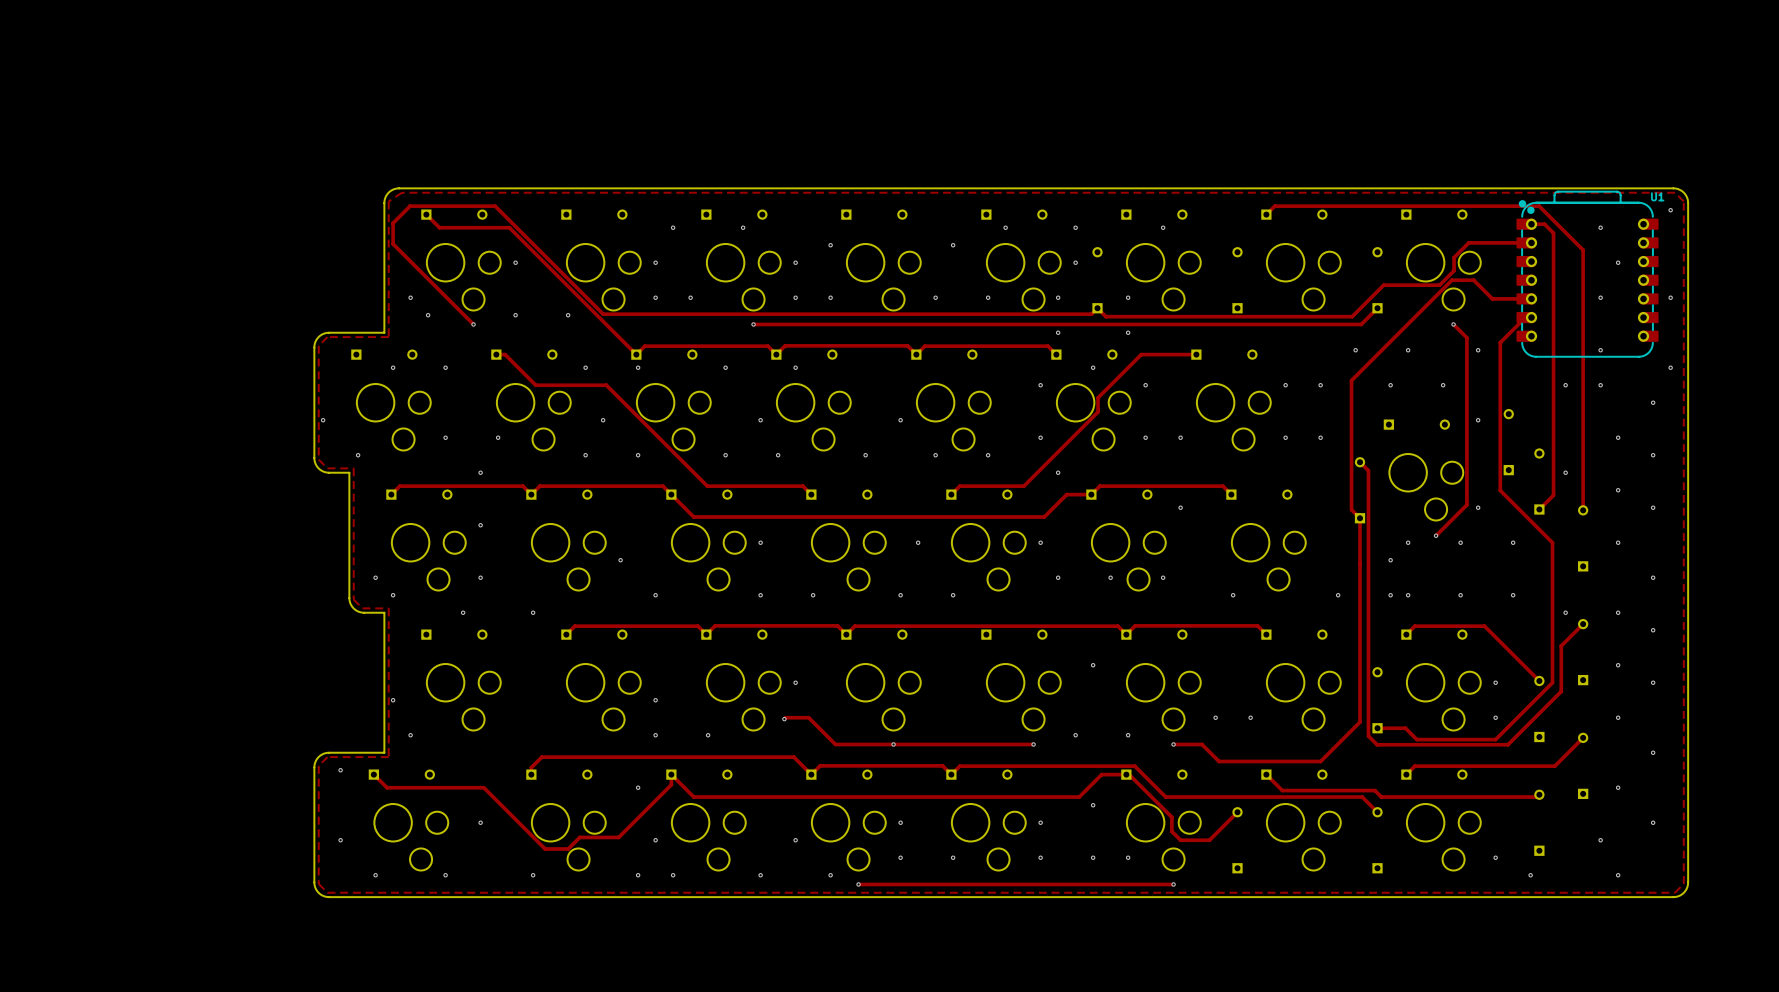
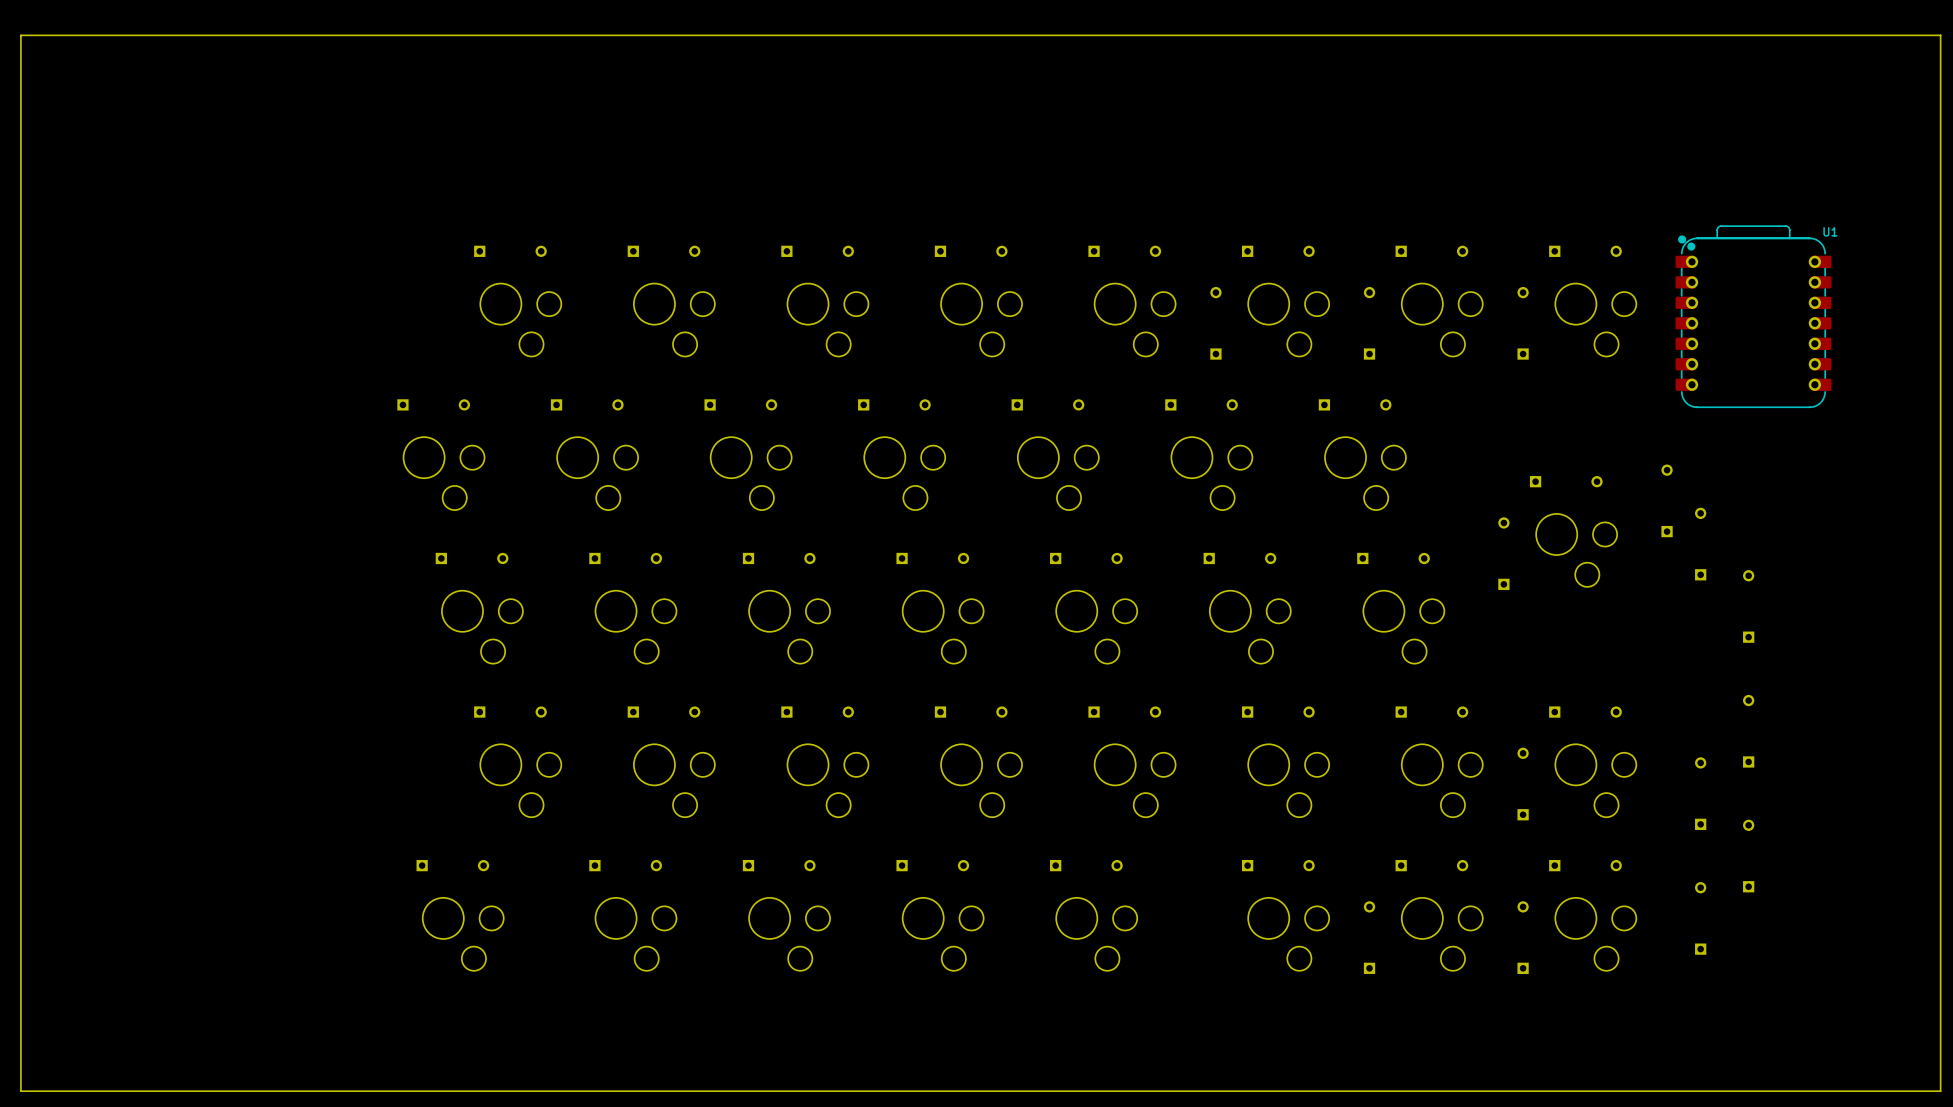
board edge: (399, 188) (1679, 189) (1685, 195) (1688, 203) (1686, 888) (1681, 894) (1673, 897) (322, 895) (317, 891) (314, 884) (314, 763) (320, 755) (327, 752) (384, 752) (384, 612) (359, 611) (353, 608) (349, 601) (349, 472) (324, 471) (317, 467) (314, 461) (314, 345) (318, 337) (327, 332) (384, 332) (384, 201) (389, 191) (399, 188) -> (20, 35) (20, 1091) (1940, 1091) (1940, 35) (20, 35)
zone outline: (401, 192) (1675, 192) (1683, 201) (1683, 883) (1675, 892) (327, 892) (318, 883) (318, 765) (327, 757) (388, 757) (388, 608) (362, 608) (353, 599) (353, 468) (327, 468) (318, 459) (318, 345) (327, 337) (388, 337) (388, 201) (401, 192) -> none
via: (1670, 210) -> none
track: (426, 214) (439, 227) (509, 227) (636, 354) (644, 346) (767, 346) (776, 354) (785, 345) (907, 345) (916, 354) (924, 346) (1047, 346) (1056, 354) -> none
track: (1266, 214) (1274, 206) (1539, 206) (1583, 250) (1583, 510) -> none
track: (1531, 224) (1544, 224) (1553, 233) (1553, 495) (1539, 509) -> none
via: (673, 227) -> none
via: (743, 227) -> none
via: (1005, 227) -> none
via: (1075, 227) -> none
via: (1163, 227) -> none
via: (1600, 227) -> none
track: (1525, 242) (1468, 242) (1454, 257) (1454, 270) (1439, 285) (1383, 285) (1352, 316) (1105, 316) (1097, 308) (1091, 314) (603, 314) (495, 206) (410, 206) (393, 223) (393, 244) (473, 324) -> none
via: (830, 245) -> none
via: (953, 245) -> none
via: (515, 262) -> none
via: (655, 262) -> none
via: (795, 262) -> none
via: (1075, 262) -> none
via: (1618, 262) -> none
via: (410, 297) -> none
via: (655, 297) -> none
via: (690, 297) -> none
via: (795, 297) -> none
via: (830, 297) -> none
via: (935, 297) -> none
via: (988, 297) -> none
via: (1058, 297) -> none
via: (1128, 297) -> none
via: (1600, 297) -> none
via: (1670, 297) -> none
track: (1525, 298) (1492, 298) (1473, 280) (1451, 280) (1351, 380) (1351, 509) (1360, 518) (1360, 722) (1320, 761) (1219, 761) (1202, 744) (1173, 744) -> none
track: (1377, 308) (1361, 324) (753, 324) -> none
via: (428, 315) -> none
via: (515, 315) -> none
via: (568, 315) -> none
track: (1525, 317) (1500, 342) (1500, 490) (1552, 542) (1552, 682) (1495, 739) (1416, 739) (1405, 728) (1377, 728) -> none
via: (473, 324) -> none
via: (753, 324) -> none
track: (1453, 324) (1466, 337) (1466, 504) (1436, 535) -> none
via: (1453, 324) -> none
via: (1058, 332) -> none
via: (1128, 332) -> none
via: (1355, 350) -> none
via: (1408, 350) -> none
via: (1478, 350) -> none
via: (1600, 350) -> none
track: (496, 354) (505, 354) (535, 385) (606, 385) (707, 486) (802, 486) (811, 494) -> none
track: (1196, 354) (1141, 354) (1098, 397) (1098, 412) (1023, 486) (959, 486) (951, 494) -> none
via: (393, 367) -> none
via: (445, 367) -> none
via: (585, 367) -> none
via: (638, 367) -> none
via: (725, 367) -> none
via: (795, 367) -> none
via: (1093, 367) -> none
via: (1670, 367) -> none
via: (1040, 385) -> none
via: (1145, 385) -> none
via: (1285, 385) -> none
via: (1320, 385) -> none
via: (1390, 385) -> none
via: (1443, 385) -> none
via: (1565, 385) -> none
via: (1600, 385) -> none
via: (1653, 402) -> none
via: (323, 420) -> none
via: (603, 420) -> none
via: (760, 420) -> none
via: (900, 420) -> none
via: (1478, 420) -> none
via: (445, 437) -> none
via: (498, 437) -> none
via: (1040, 437) -> none
via: (1145, 437) -> none
via: (1180, 437) -> none
via: (1285, 437) -> none
via: (1320, 437) -> none
via: (1618, 437) -> none
via: (358, 455) -> none
via: (585, 455) -> none
via: (638, 455) -> none
via: (725, 455) -> none
via: (778, 455) -> none
via: (865, 455) -> none
via: (935, 455) -> none
via: (988, 455) -> none
via: (1653, 455) -> none
track: (1360, 462) (1368, 470) (1368, 736) (1377, 744) (1507, 744) (1561, 691) (1561, 645) (1583, 624) -> none
via: (480, 472) -> none
via: (1058, 472) -> none
via: (1565, 472) -> none
via: (1618, 490) -> none
track: (391, 494) (399, 486) (522, 486) (531, 494) (539, 486) (662, 486) (693, 517) (1044, 517) (1066, 494) (1091, 494) (1099, 486) (1222, 486) (1231, 494) -> none
via: (1180, 507) -> none
via: (1478, 507) -> none
via: (1653, 507) -> none
via: (480, 525) -> none
via: (1436, 535) -> none
via: (760, 542) -> none
via: (918, 542) -> none
via: (1040, 542) -> none
via: (1408, 542) -> none
via: (1460, 542) -> none
via: (1513, 542) -> none
via: (1618, 542) -> none
via: (620, 560) -> none
via: (1390, 560) -> none
via: (375, 577) -> none
via: (480, 577) -> none
via: (1058, 577) -> none
via: (1110, 577) -> none
via: (1163, 577) -> none
via: (1653, 577) -> none
via: (393, 595) -> none
via: (655, 595) -> none
via: (760, 595) -> none
via: (813, 595) -> none
via: (900, 595) -> none
via: (953, 595) -> none
via: (1233, 595) -> none
via: (1338, 595) -> none
via: (1390, 595) -> none
via: (1408, 595) -> none
via: (1460, 595) -> none
via: (1513, 595) -> none
via: (463, 612) -> none
via: (533, 612) -> none
via: (1565, 612) -> none
via: (1618, 612) -> none
via: (1653, 630) -> none
track: (566, 634) (574, 626) (697, 626) (706, 634) (715, 625) (837, 625) (846, 634) (854, 626) (1117, 626) (1126, 634) (1135, 625) (1257, 625) (1266, 634) -> none
track: (1406, 634) (1414, 626) (1484, 626) (1539, 680) -> none
via: (1093, 665) -> none
via: (1618, 665) -> none
via: (795, 682) -> none
via: (1495, 682) -> none
via: (1653, 682) -> none
via: (393, 700) -> none
via: (655, 700) -> none
via: (1215, 717) -> none
via: (1250, 717) -> none
via: (1495, 717) -> none
via: (1618, 717) -> none
track: (784, 719) (808, 717) (835, 744) (1033, 744) -> none
via: (784, 719) -> none
via: (410, 735) -> none
via: (655, 735) -> none
via: (708, 735) -> none
via: (1075, 735) -> none
via: (1128, 735) -> none
track: (1583, 737) (1554, 766) (1414, 766) (1406, 774) -> none
via: (893, 744) -> none
via: (1033, 744) -> none
via: (1173, 744) -> none
via: (1653, 752) -> none
via: (340, 770) -> none
track: (373, 774) (386, 787) (483, 787) (545, 848) (568, 848) (579, 837) (618, 837) (671, 784) (671, 774) (693, 797) (1079, 797) (1101, 774) (1129, 774) (1171, 817) (1171, 831) (1180, 840) (1209, 840) (1237, 812) -> none
track: (531, 774) (531, 767) (541, 757) (793, 757) (811, 774) (820, 765) (942, 765) (951, 774) (959, 766) (1134, 766) (1165, 797) (1362, 797) (1377, 812) -> none
track: (1266, 774) (1282, 790) (1374, 790) (1381, 797) (1537, 797) (1539, 794) -> none
via: (638, 787) -> none
via: (1618, 787) -> none
via: (1093, 805) -> none
via: (480, 822) -> none
via: (900, 822) -> none
via: (1040, 822) -> none
via: (1653, 822) -> none
via: (340, 840) -> none
via: (655, 840) -> none
via: (795, 840) -> none
via: (1600, 840) -> none
via: (900, 857) -> none
via: (953, 857) -> none
via: (1040, 857) -> none
via: (1093, 857) -> none
via: (1128, 857) -> none
via: (1495, 857) -> none
via: (375, 875) -> none
via: (445, 875) -> none
via: (533, 875) -> none
via: (638, 875) -> none
via: (673, 875) -> none
via: (760, 875) -> none
via: (830, 875) -> none
via: (1530, 875) -> none
via: (1618, 875) -> none
track: (858, 884) (1173, 884) -> none
via: (858, 884) -> none
via: (1173, 884) -> none

